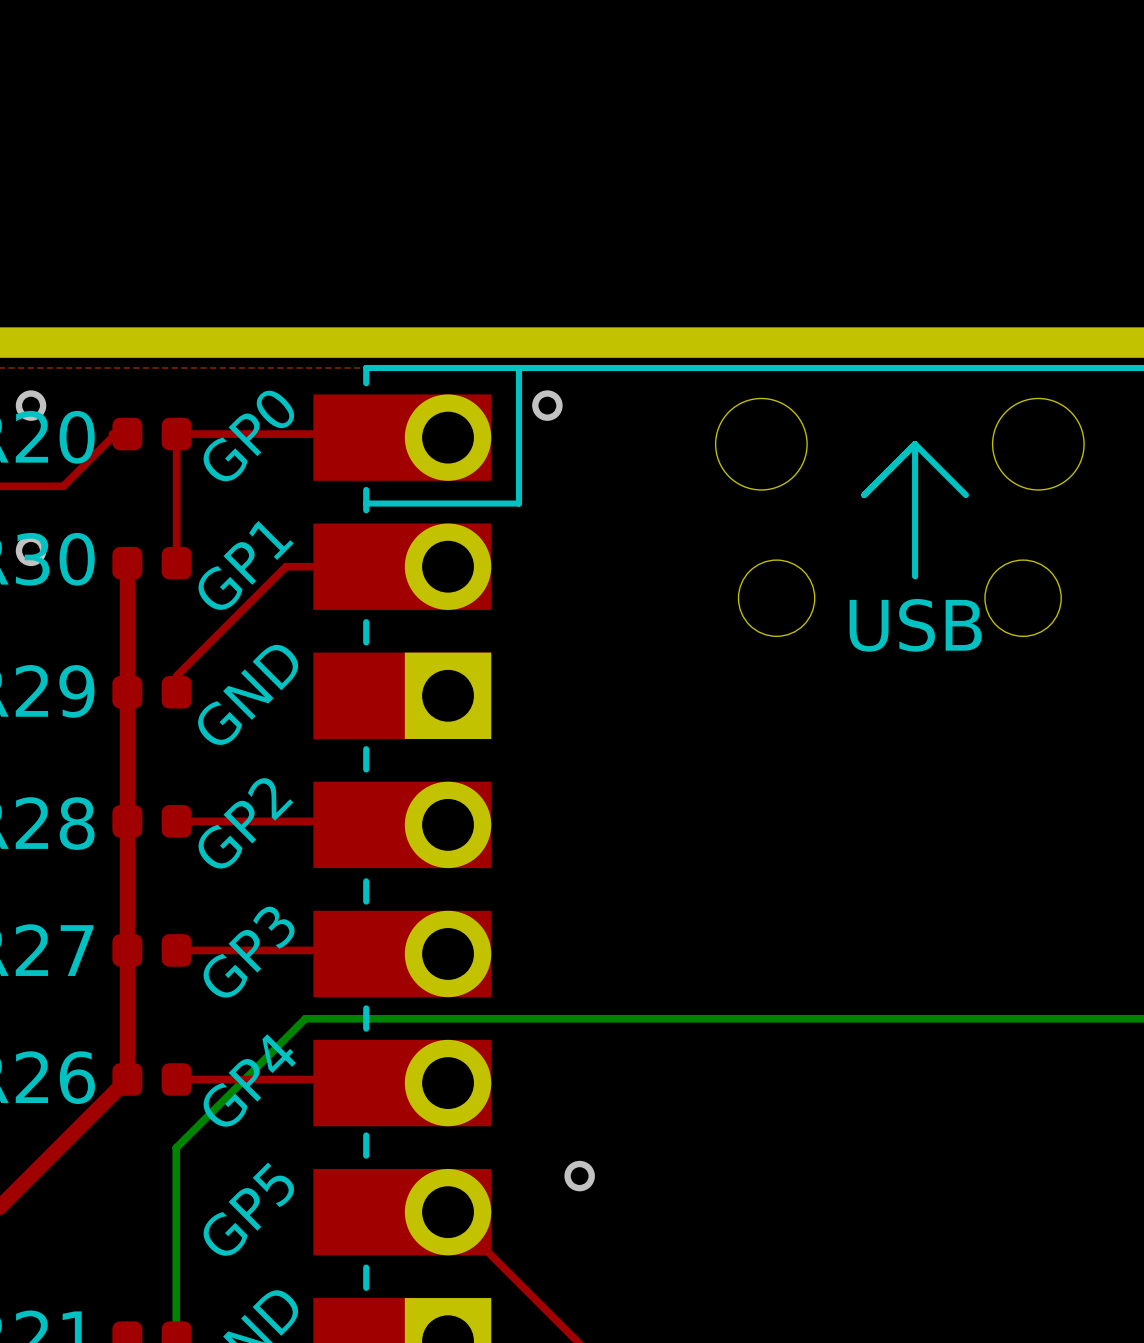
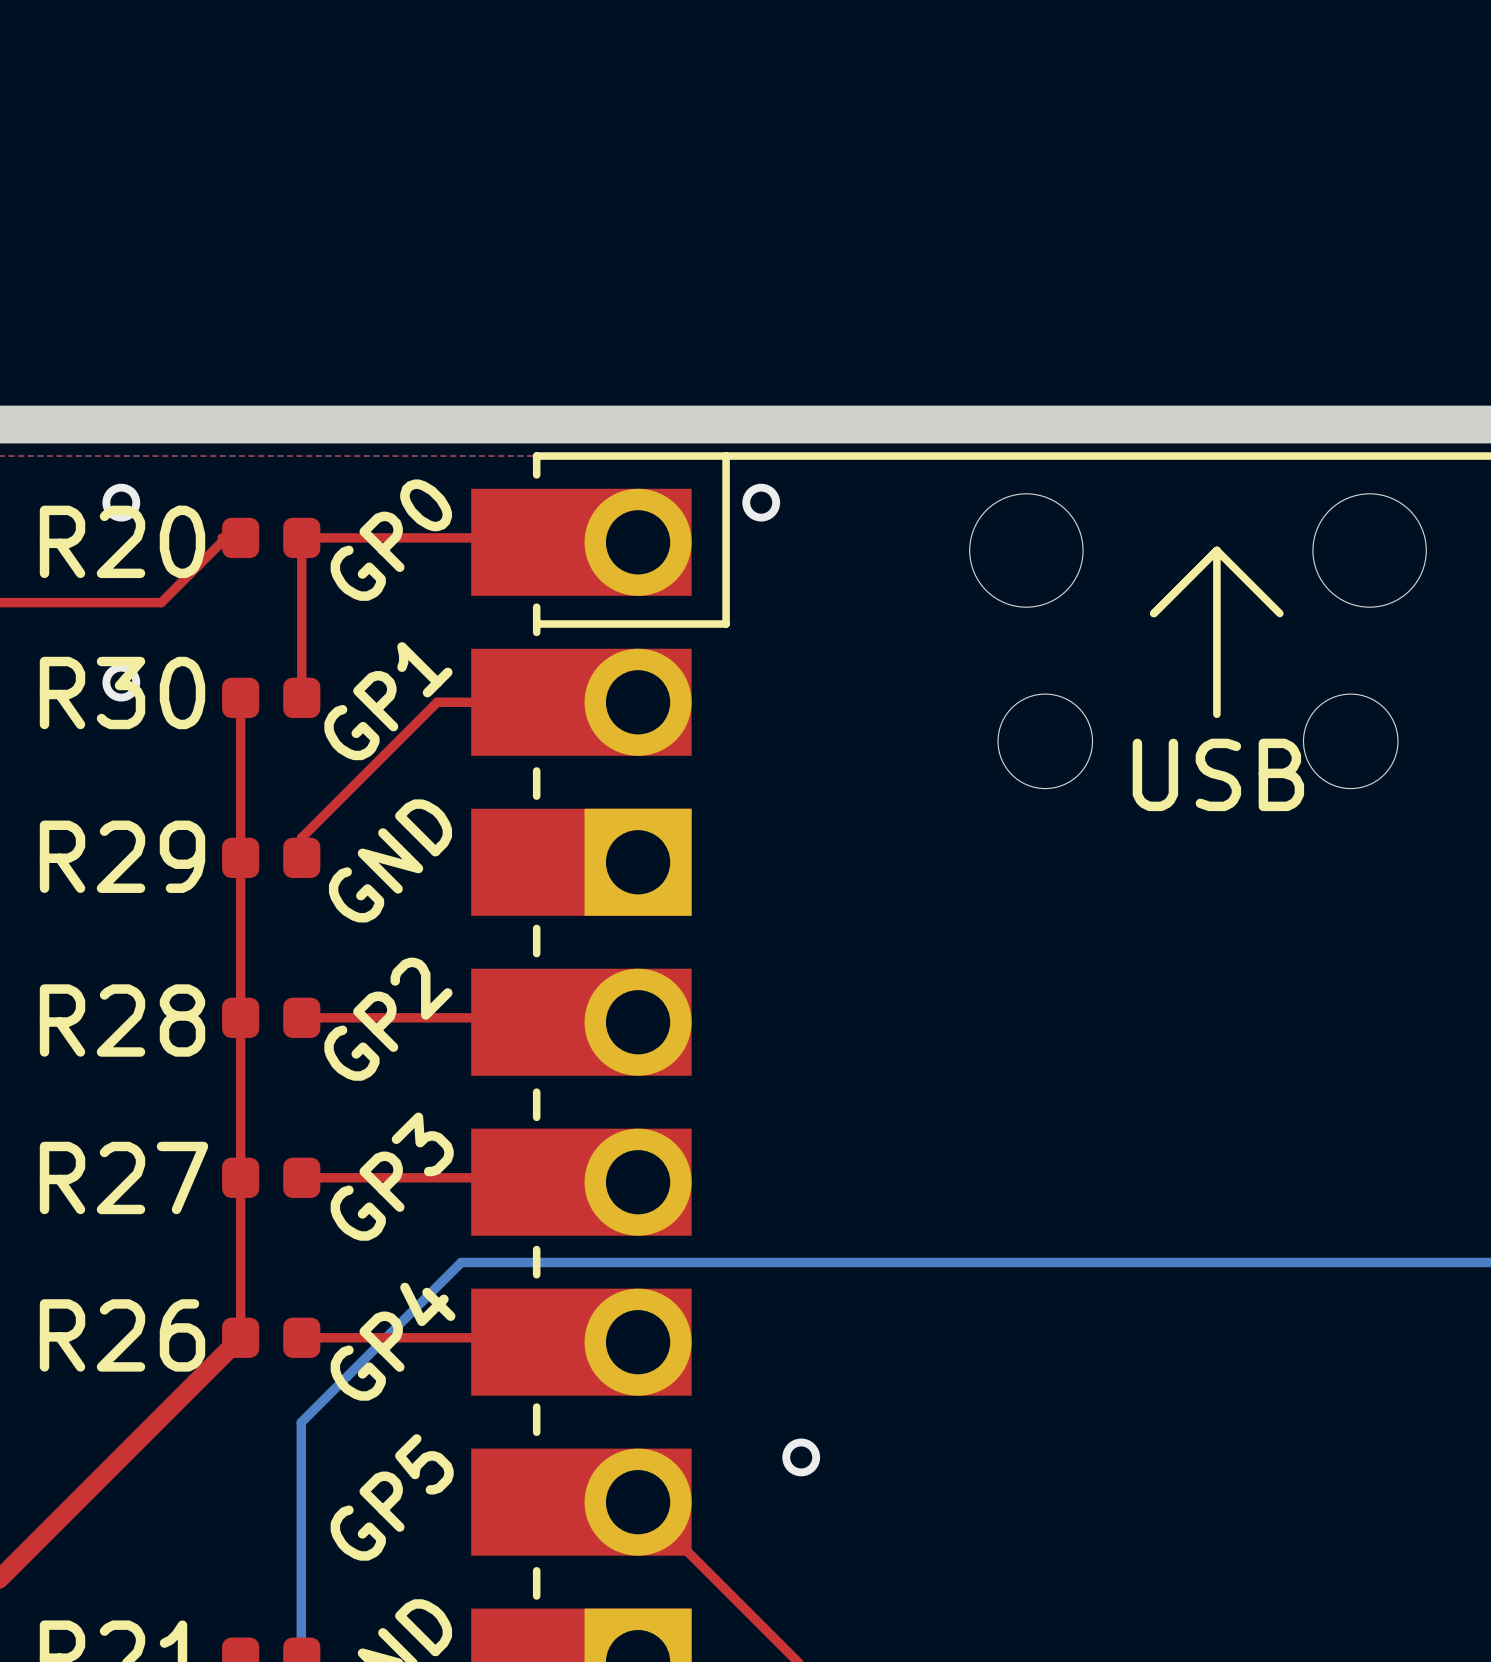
top track width: thick (127, 563) (127, 1079) -> thin (240, 697) (240, 1337)

